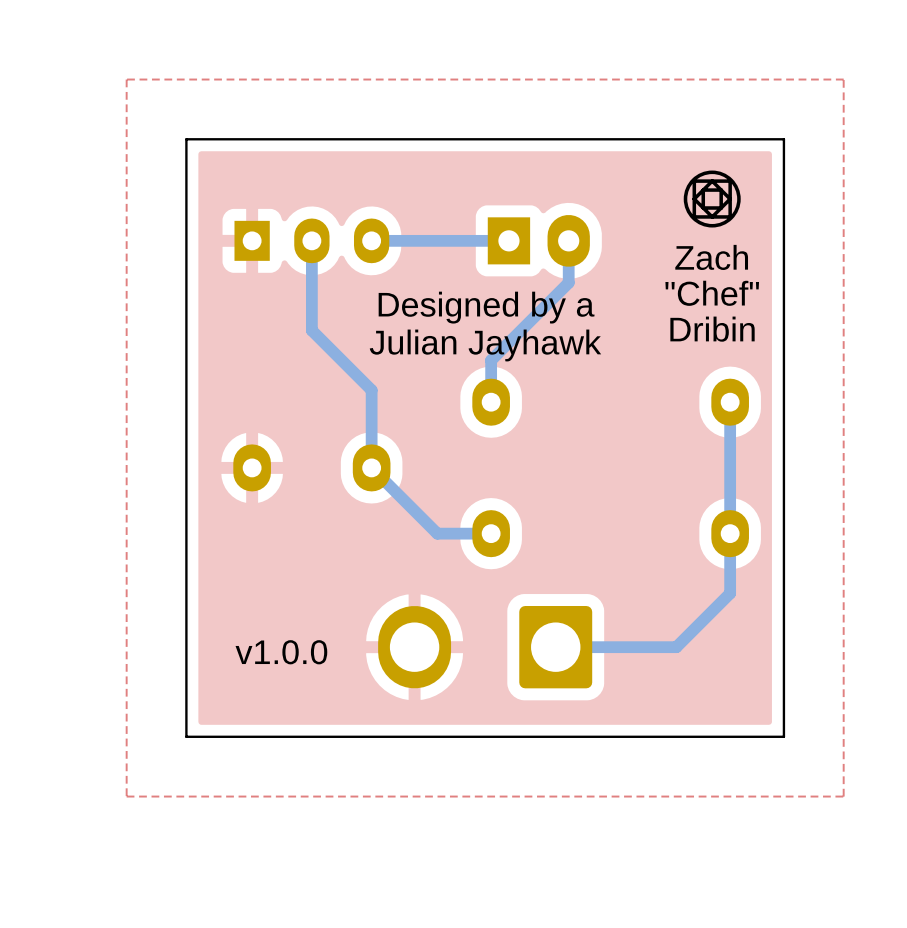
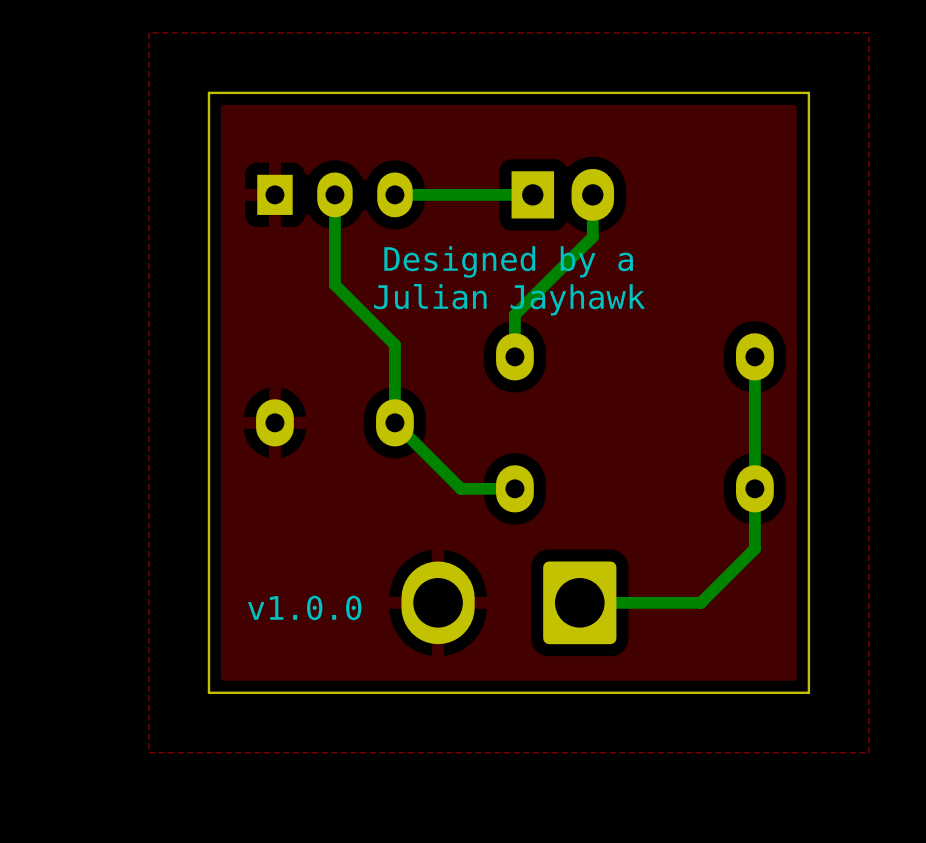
drawing: [683, 170, 741, 228] -> none
line: (712, 181) (730, 199) (712, 216) (694, 199) (712, 181) -> none
line: (730, 181) (730, 216) (694, 216) (694, 181) (730, 181) -> none
line: (721, 190) (703, 190) (703, 207) (721, 207) (721, 190) -> none
text: Zach (711, 257) -> none
text: "Chef" (712, 293) -> none
text: Dribin (712, 329) -> none

